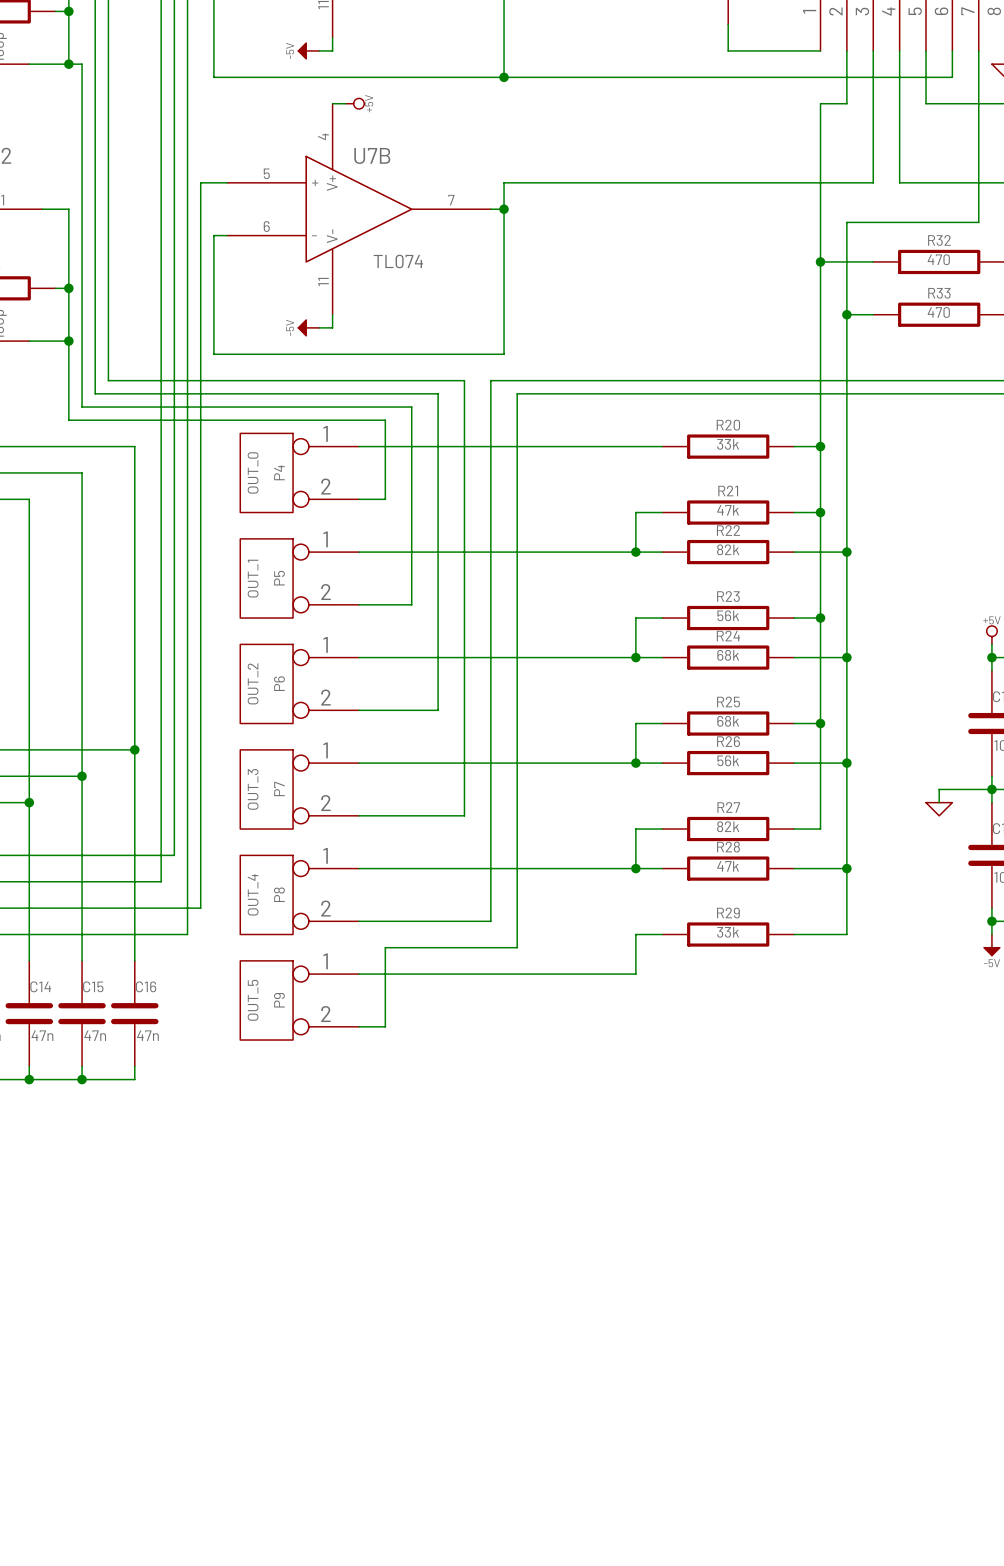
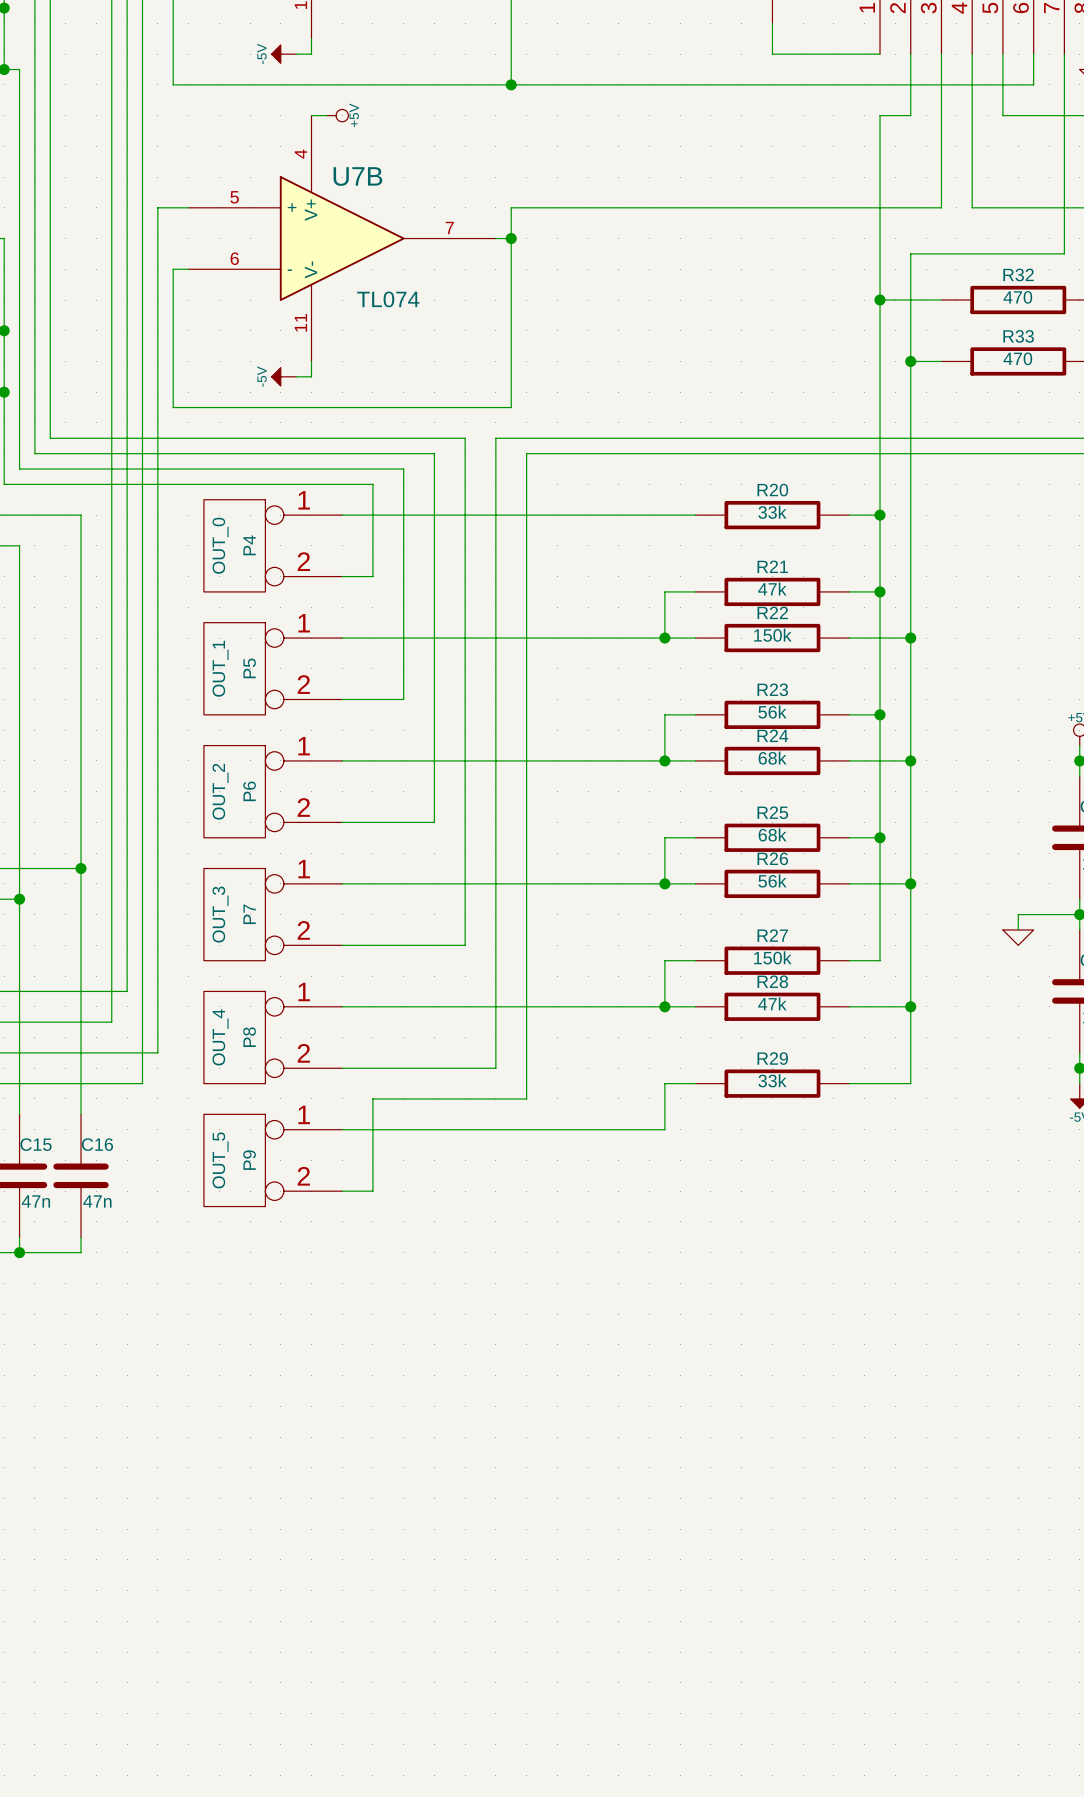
R22 value: 82k (728, 549) -> 150k (772, 635)
R27 value: 82k (728, 826) -> 150k (772, 957)

